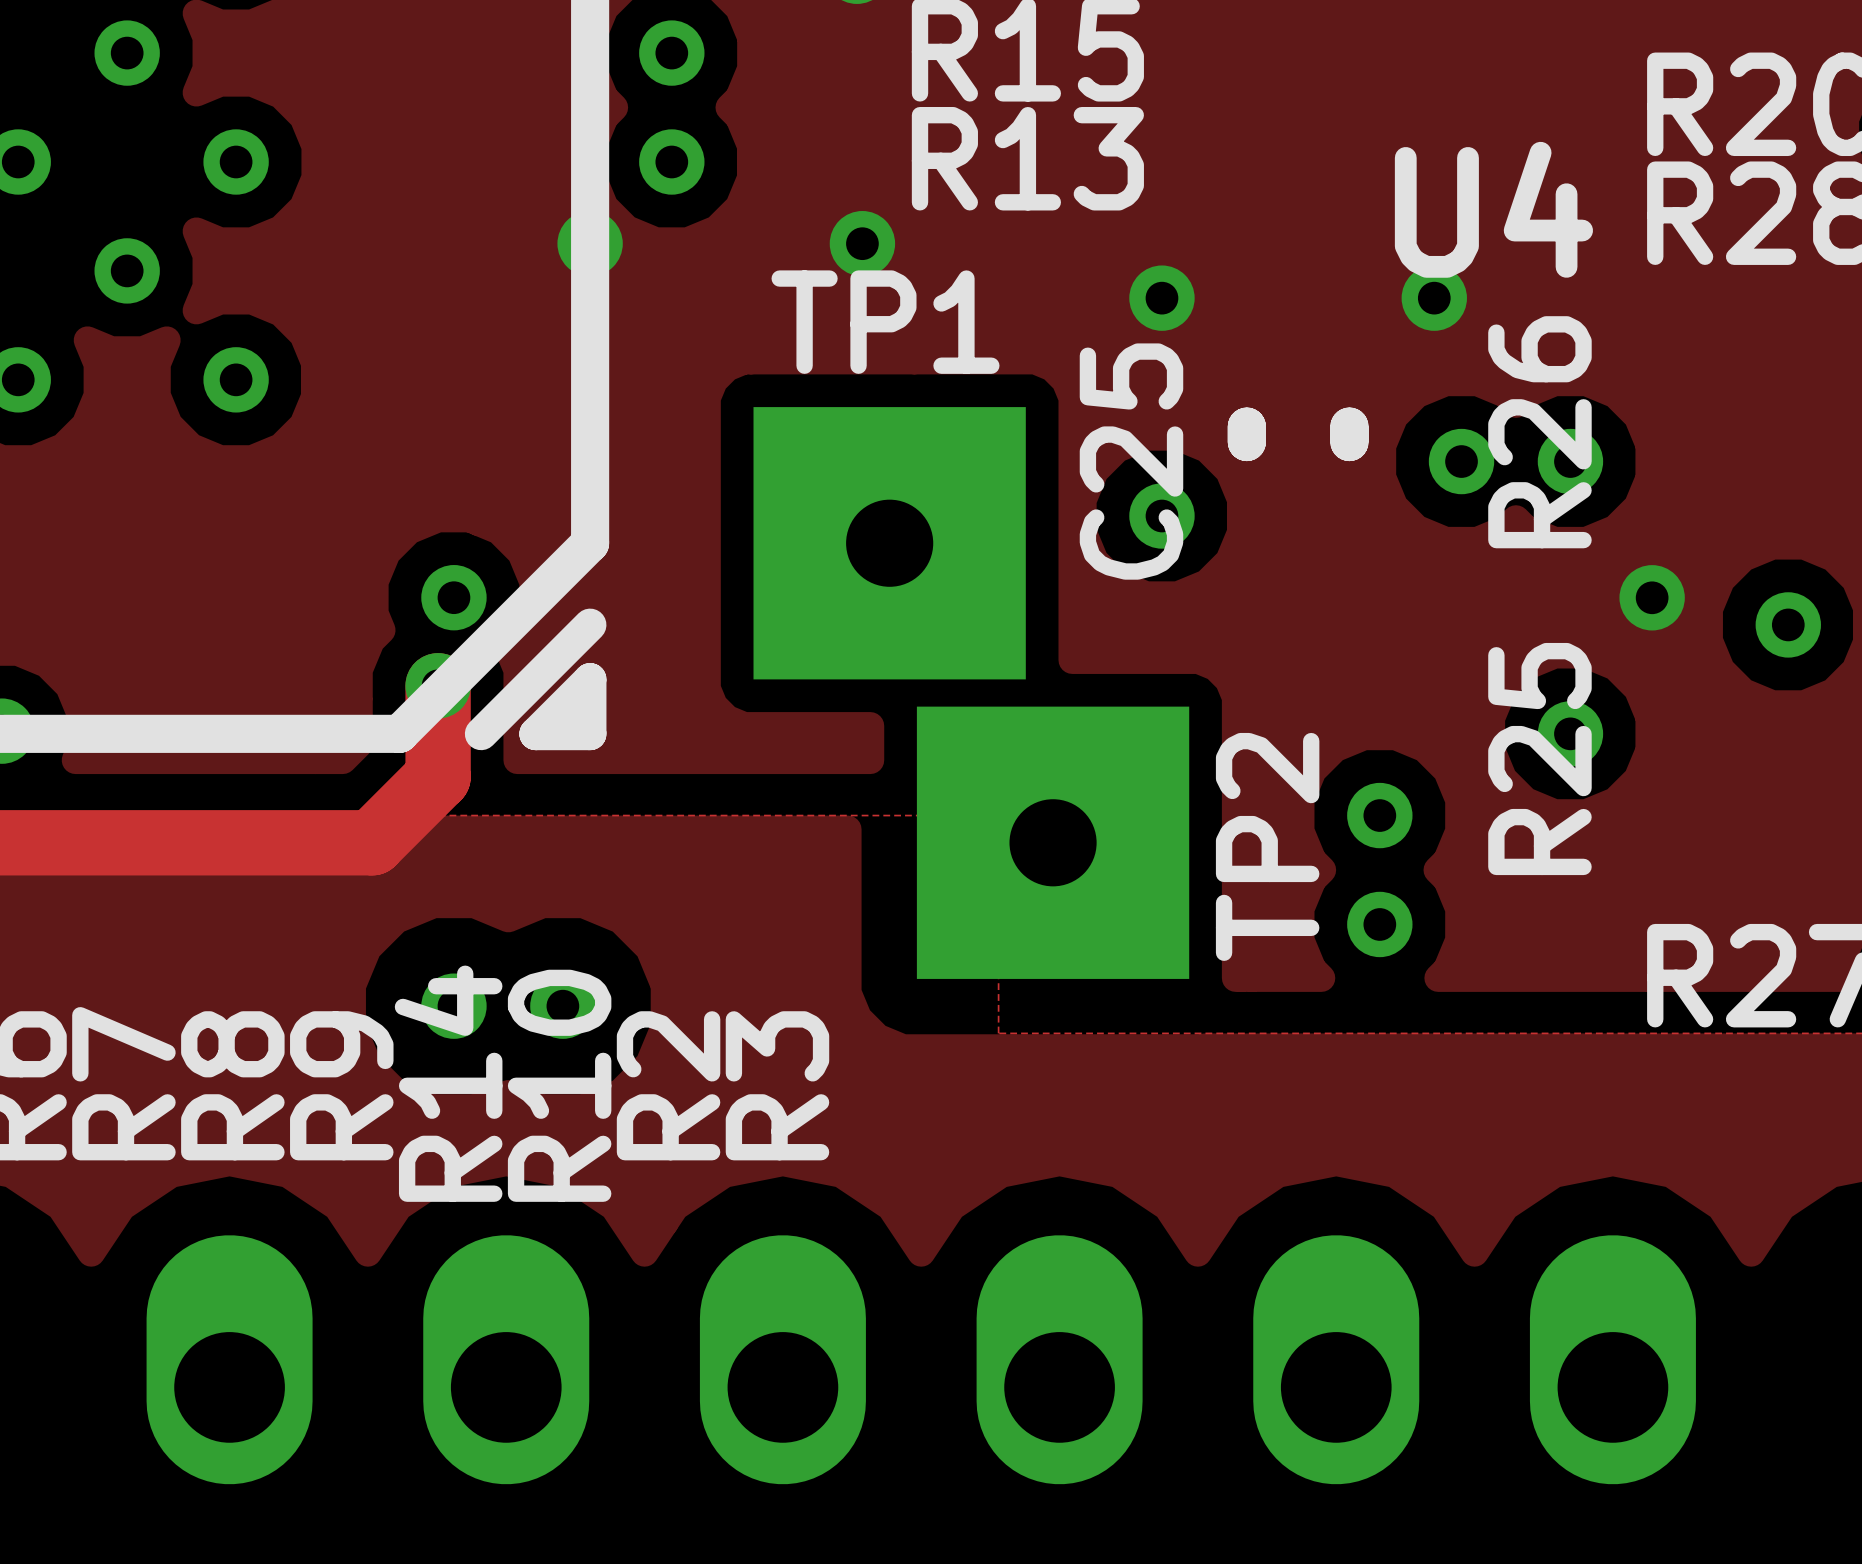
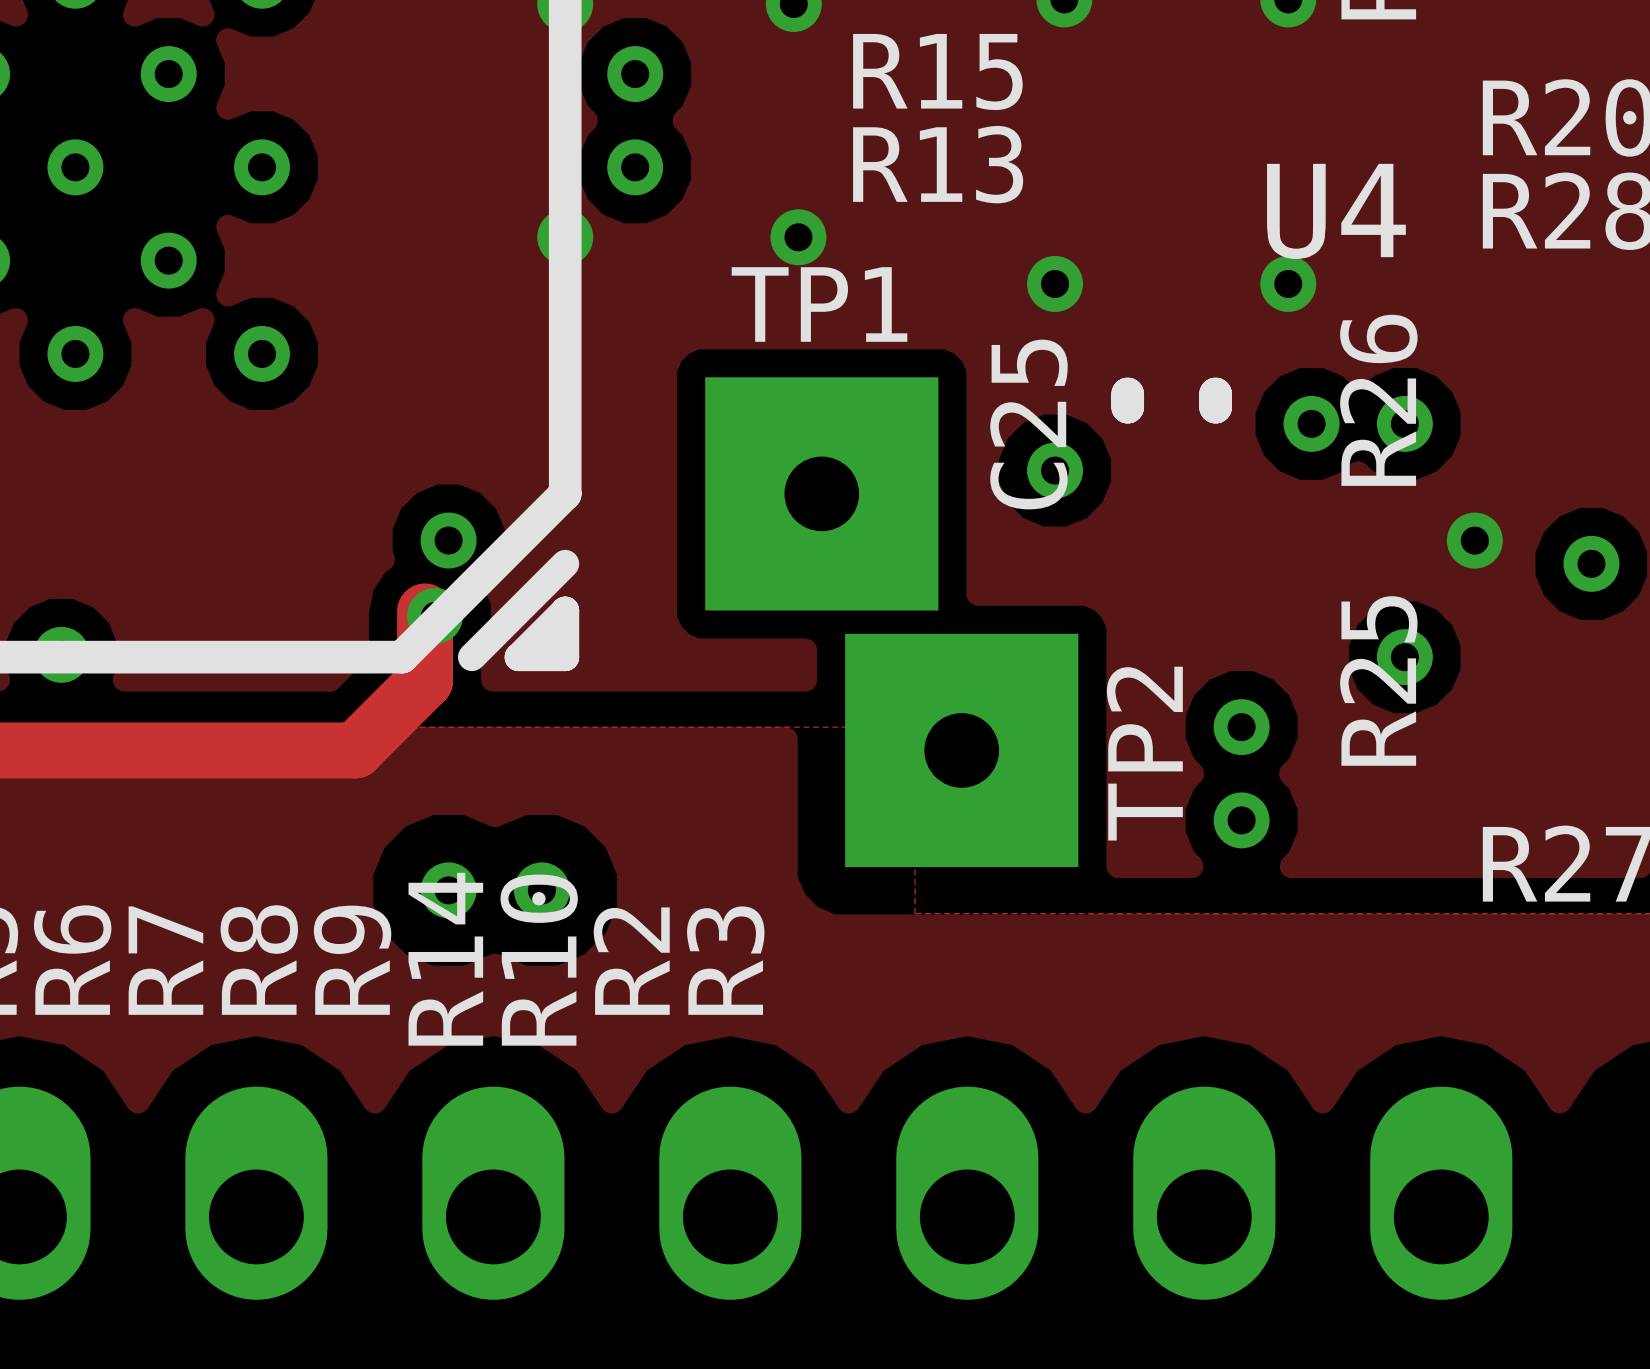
track: (438, 685) (438, 776) (372, 842) (345, 842) -> (425, 611) (425, 680) (355, 750)

